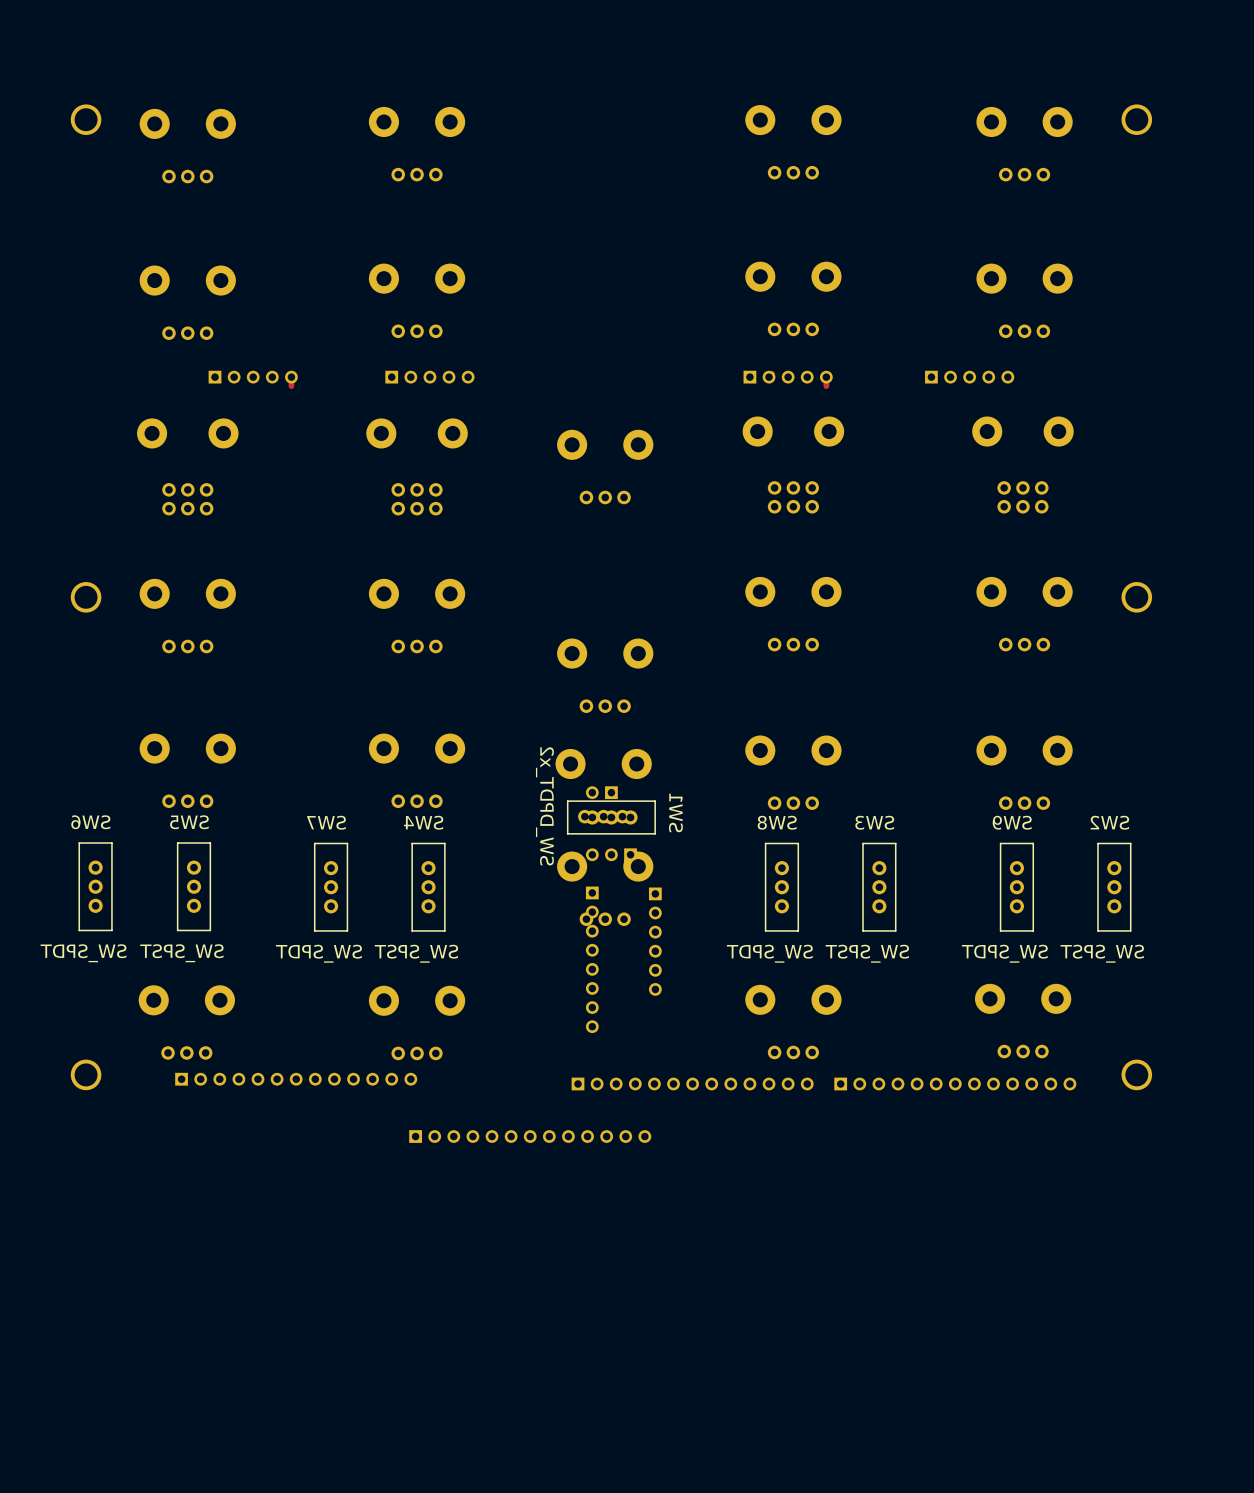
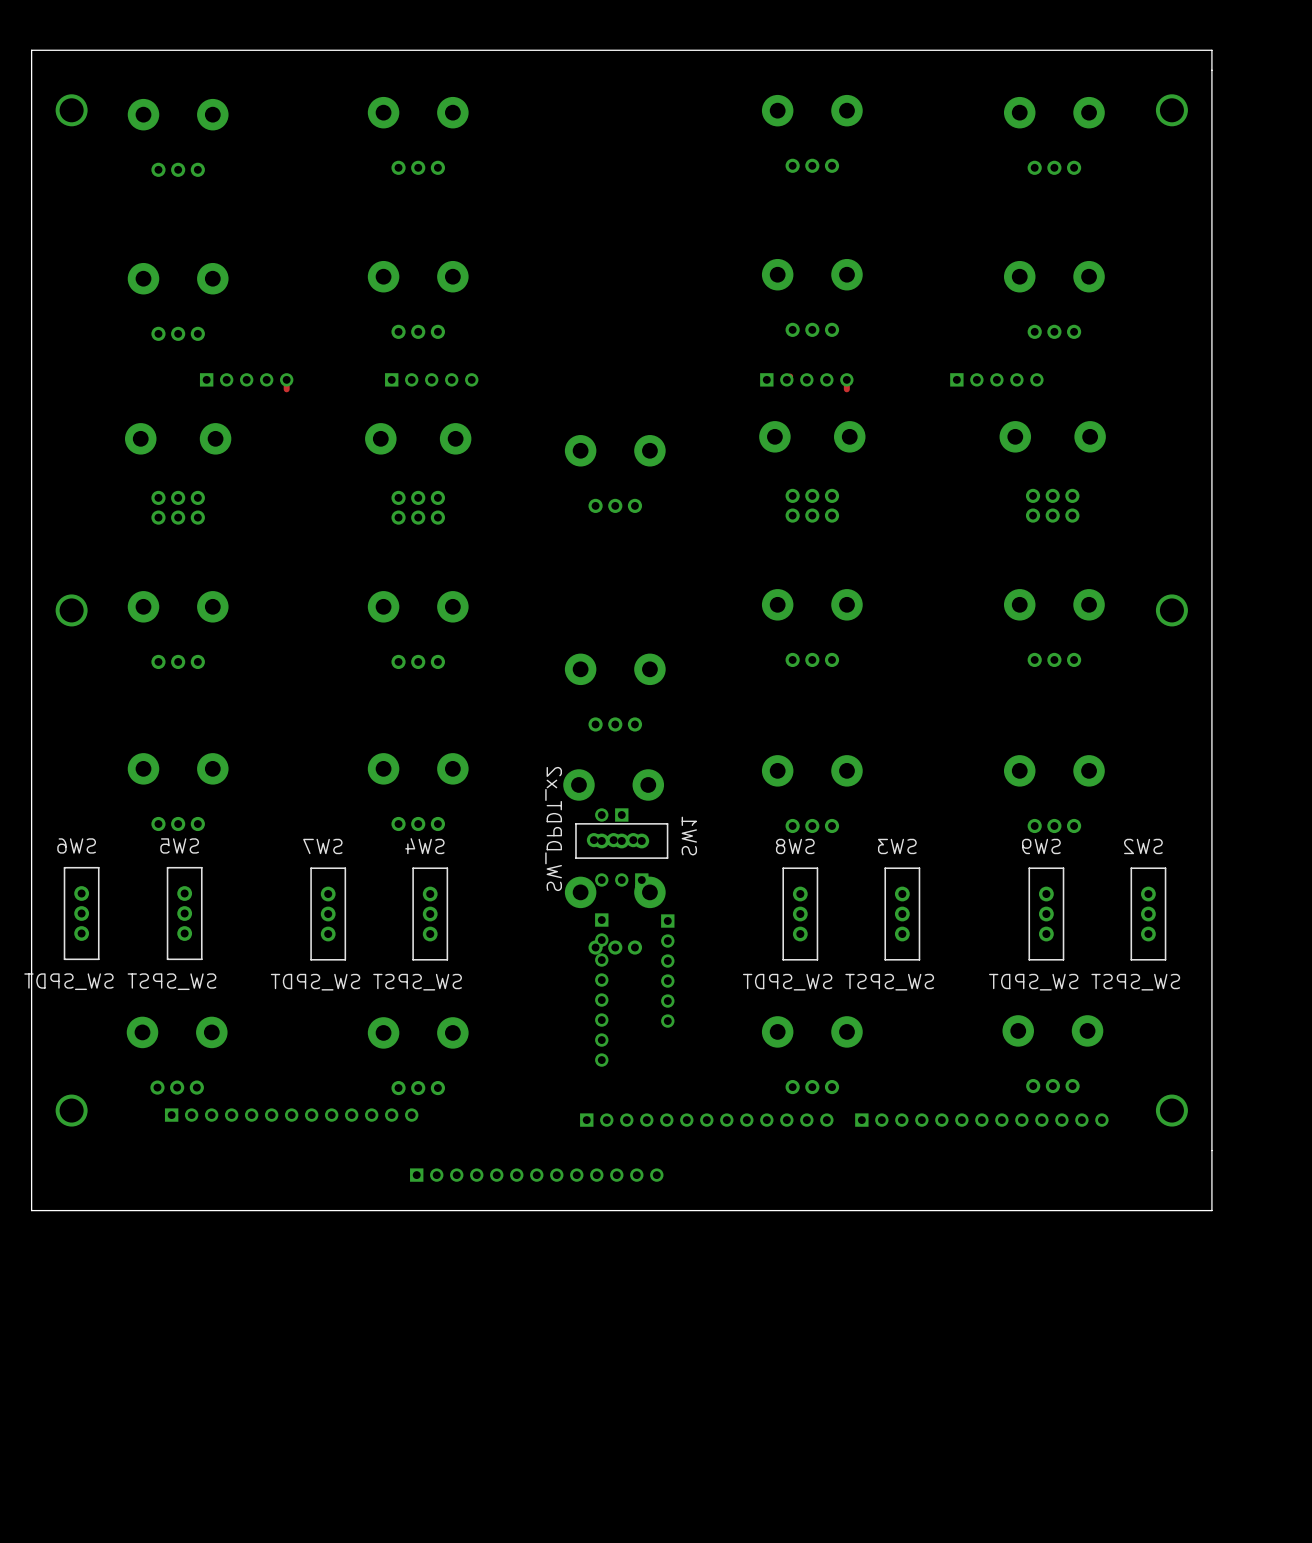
board edge: none -> (1211, 50) (1211, 1210) (31, 1210) (31, 50) (1211, 50)

